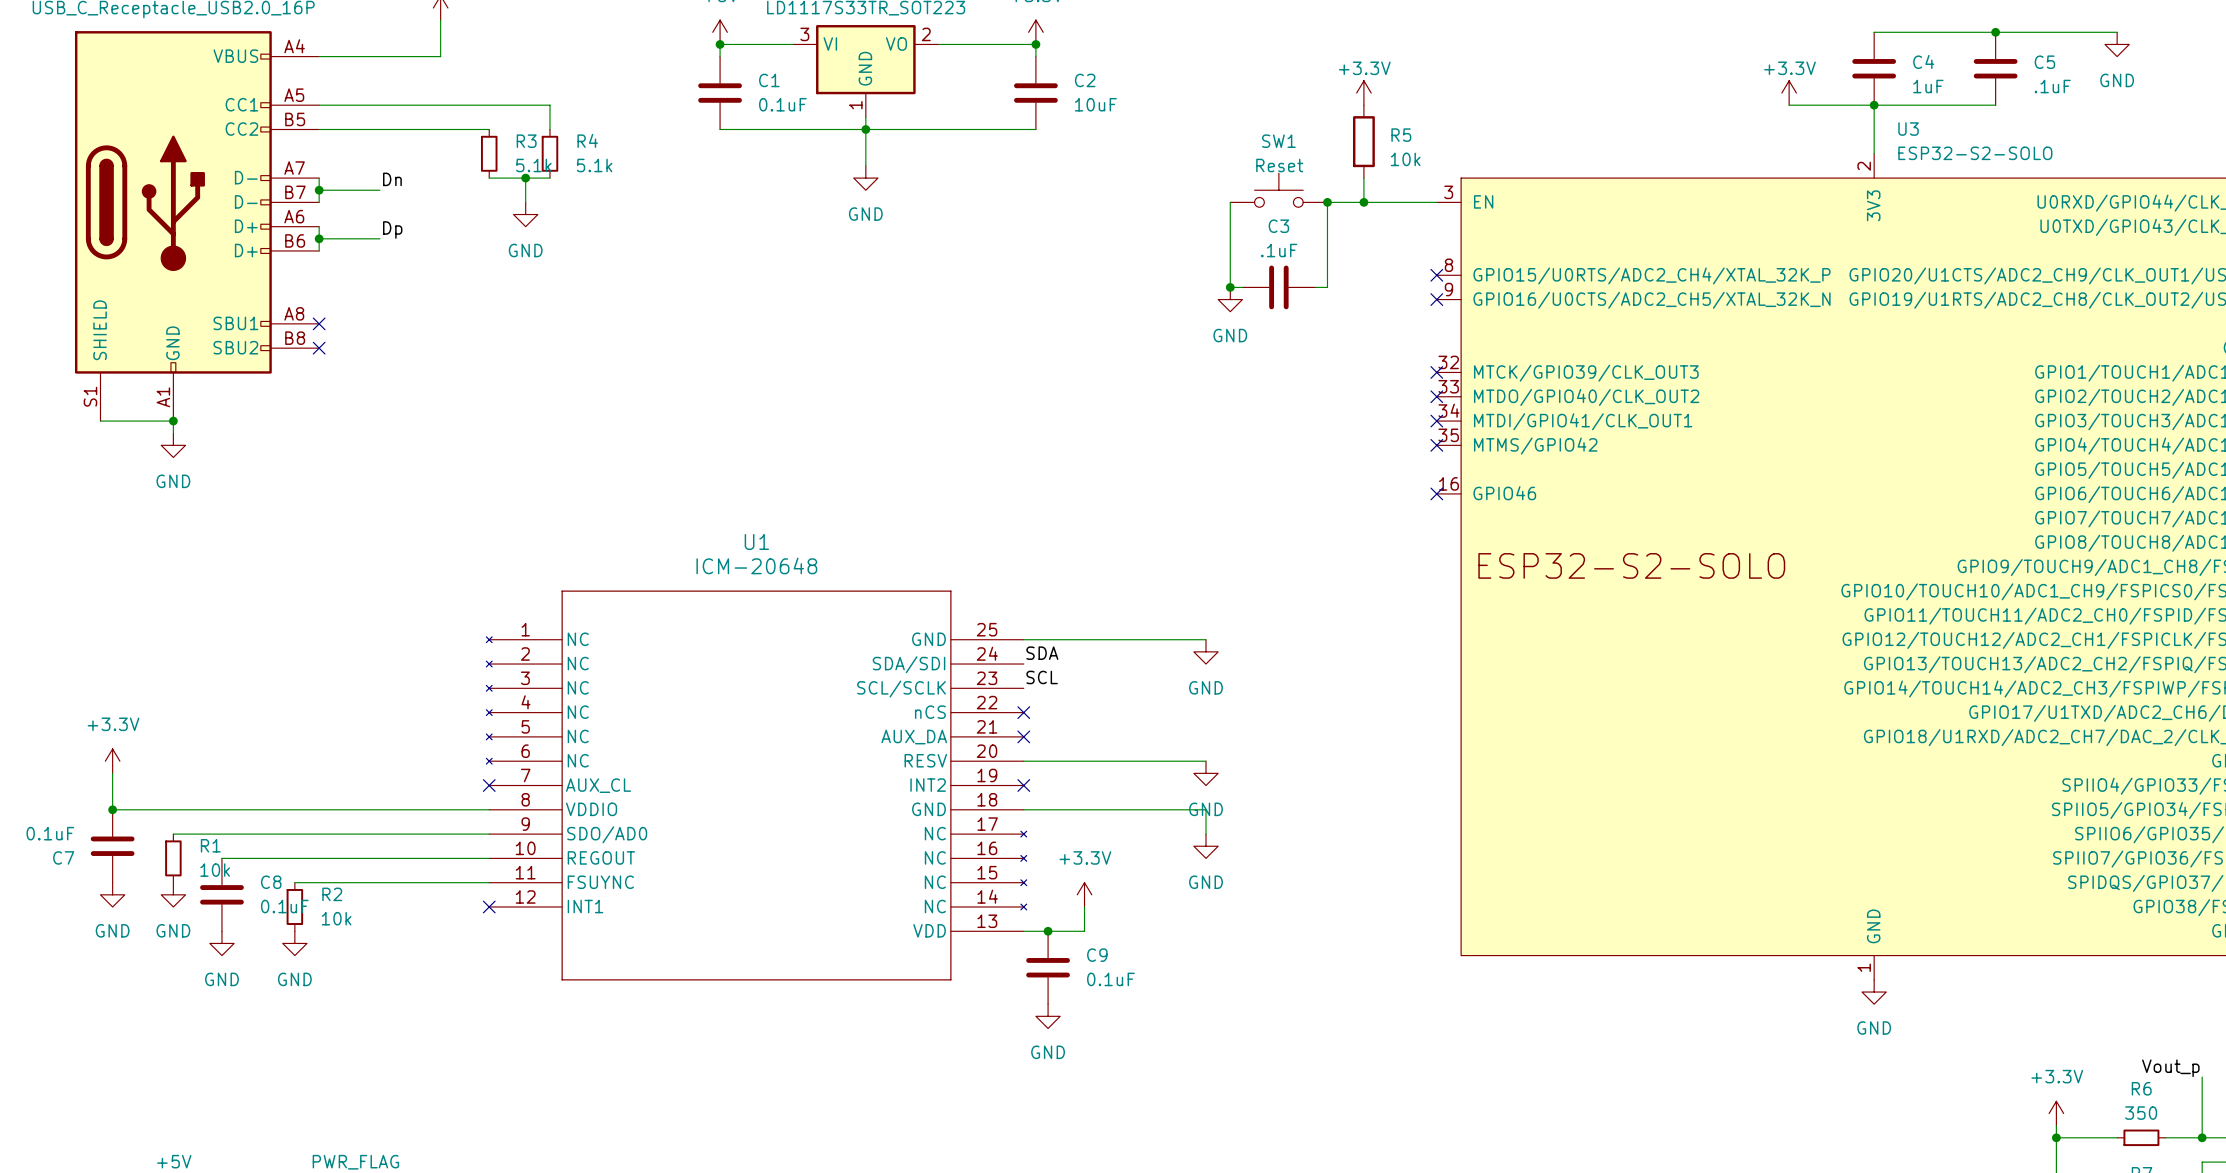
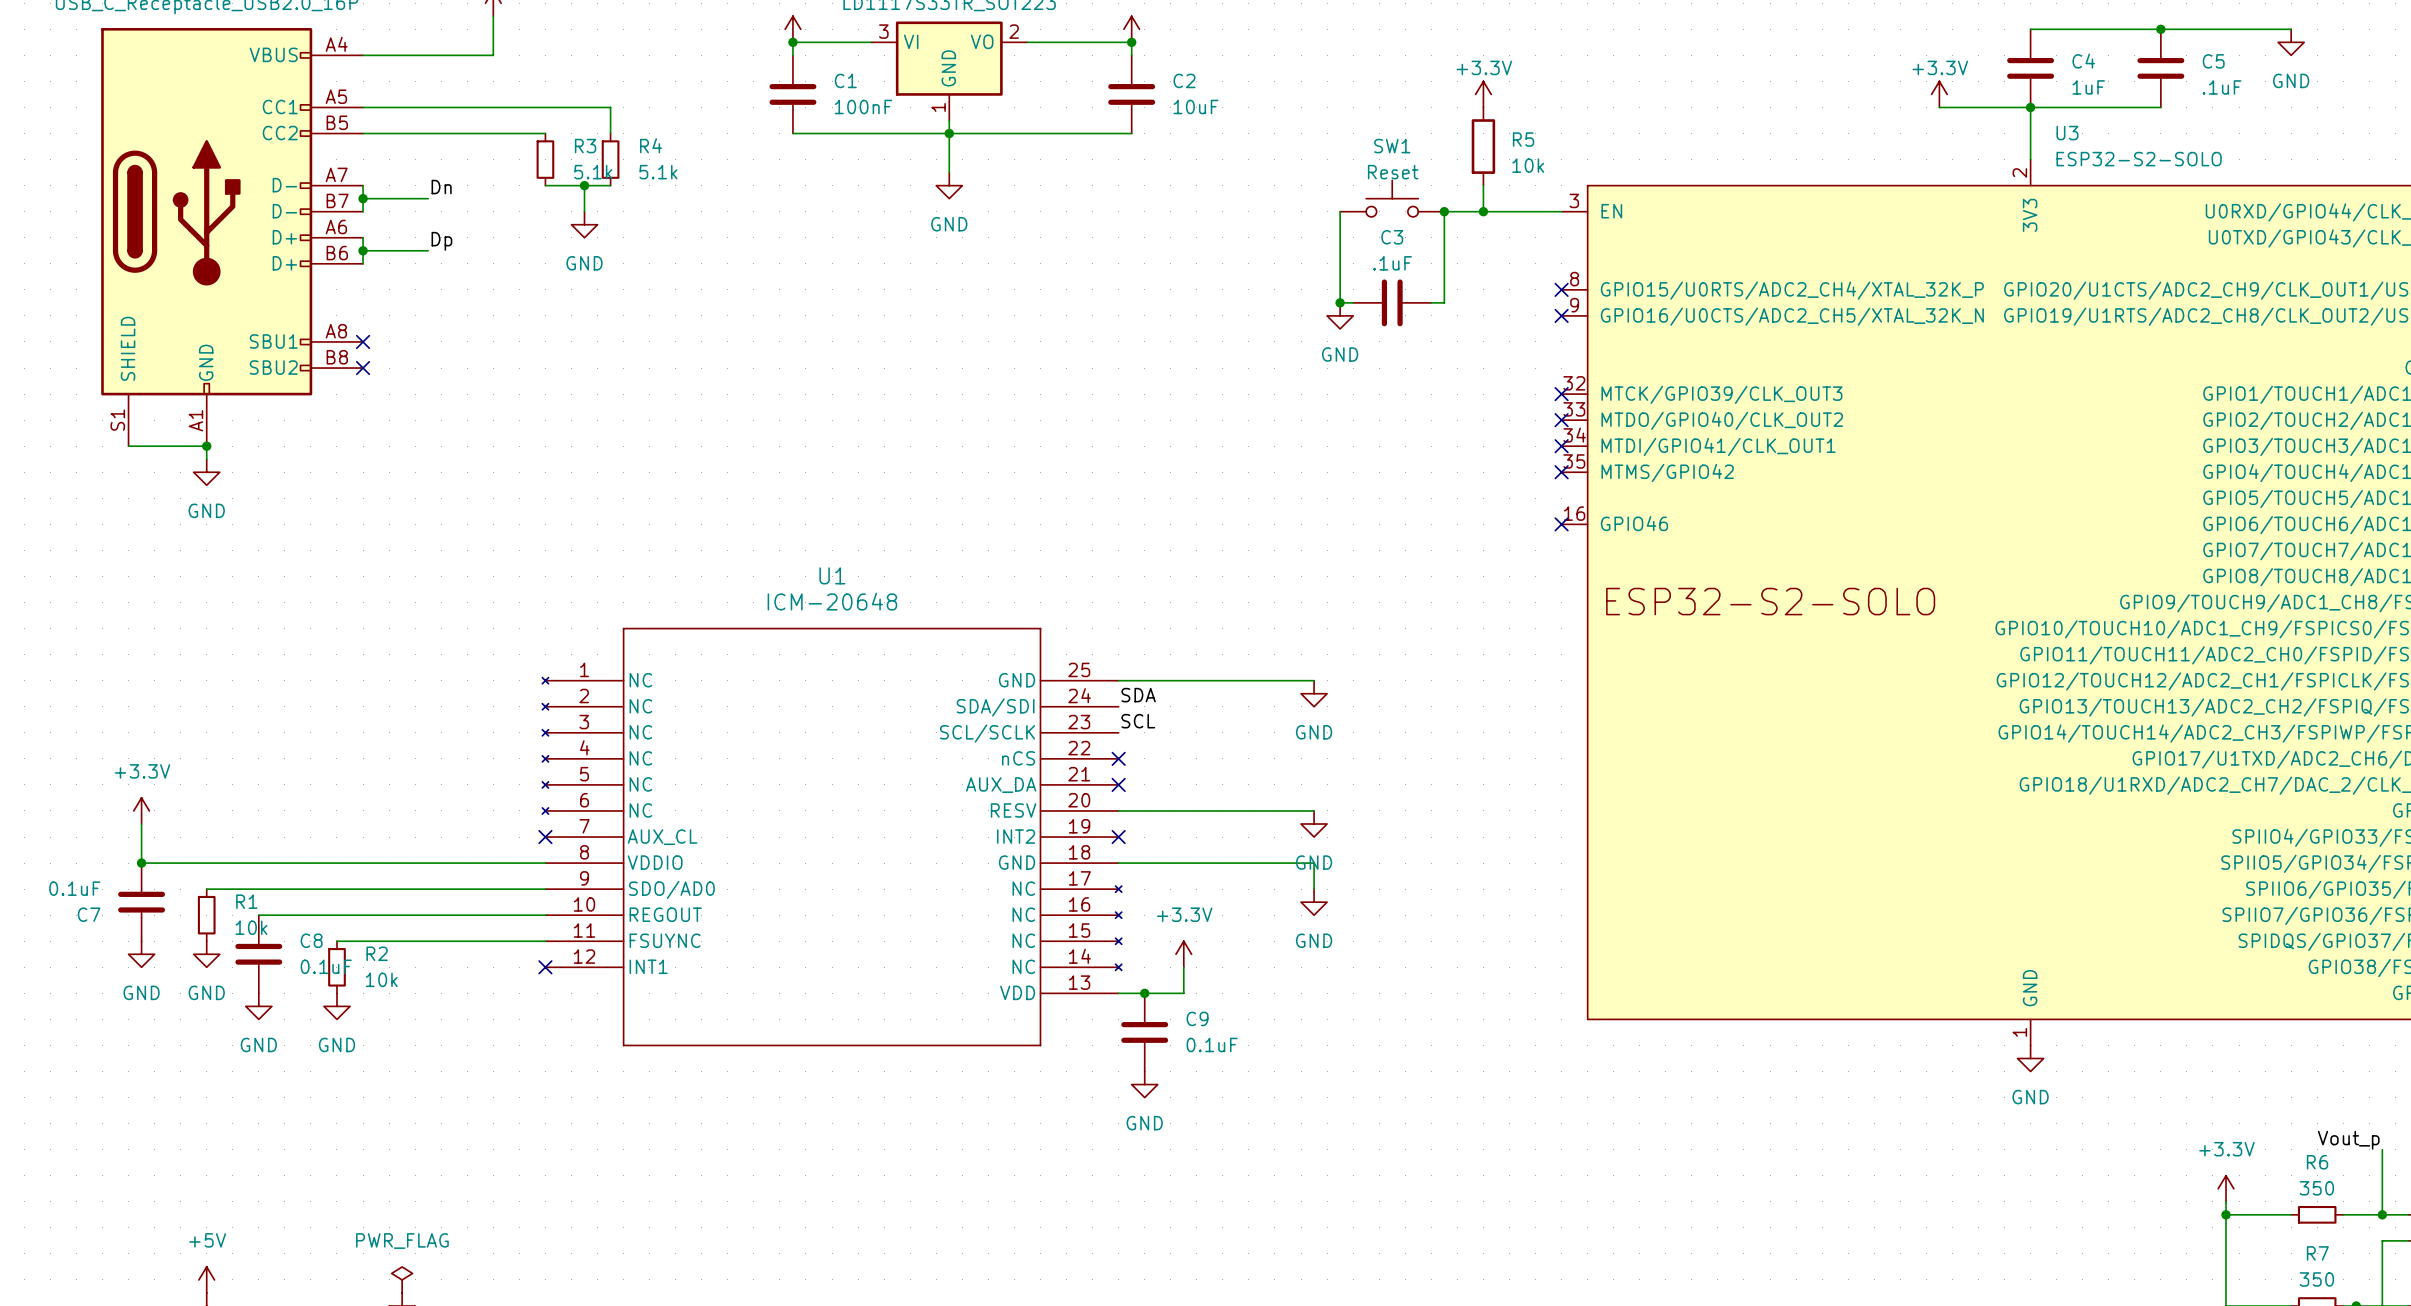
C1 value: 0.1uF (782, 104) -> 100nF (863, 106)

